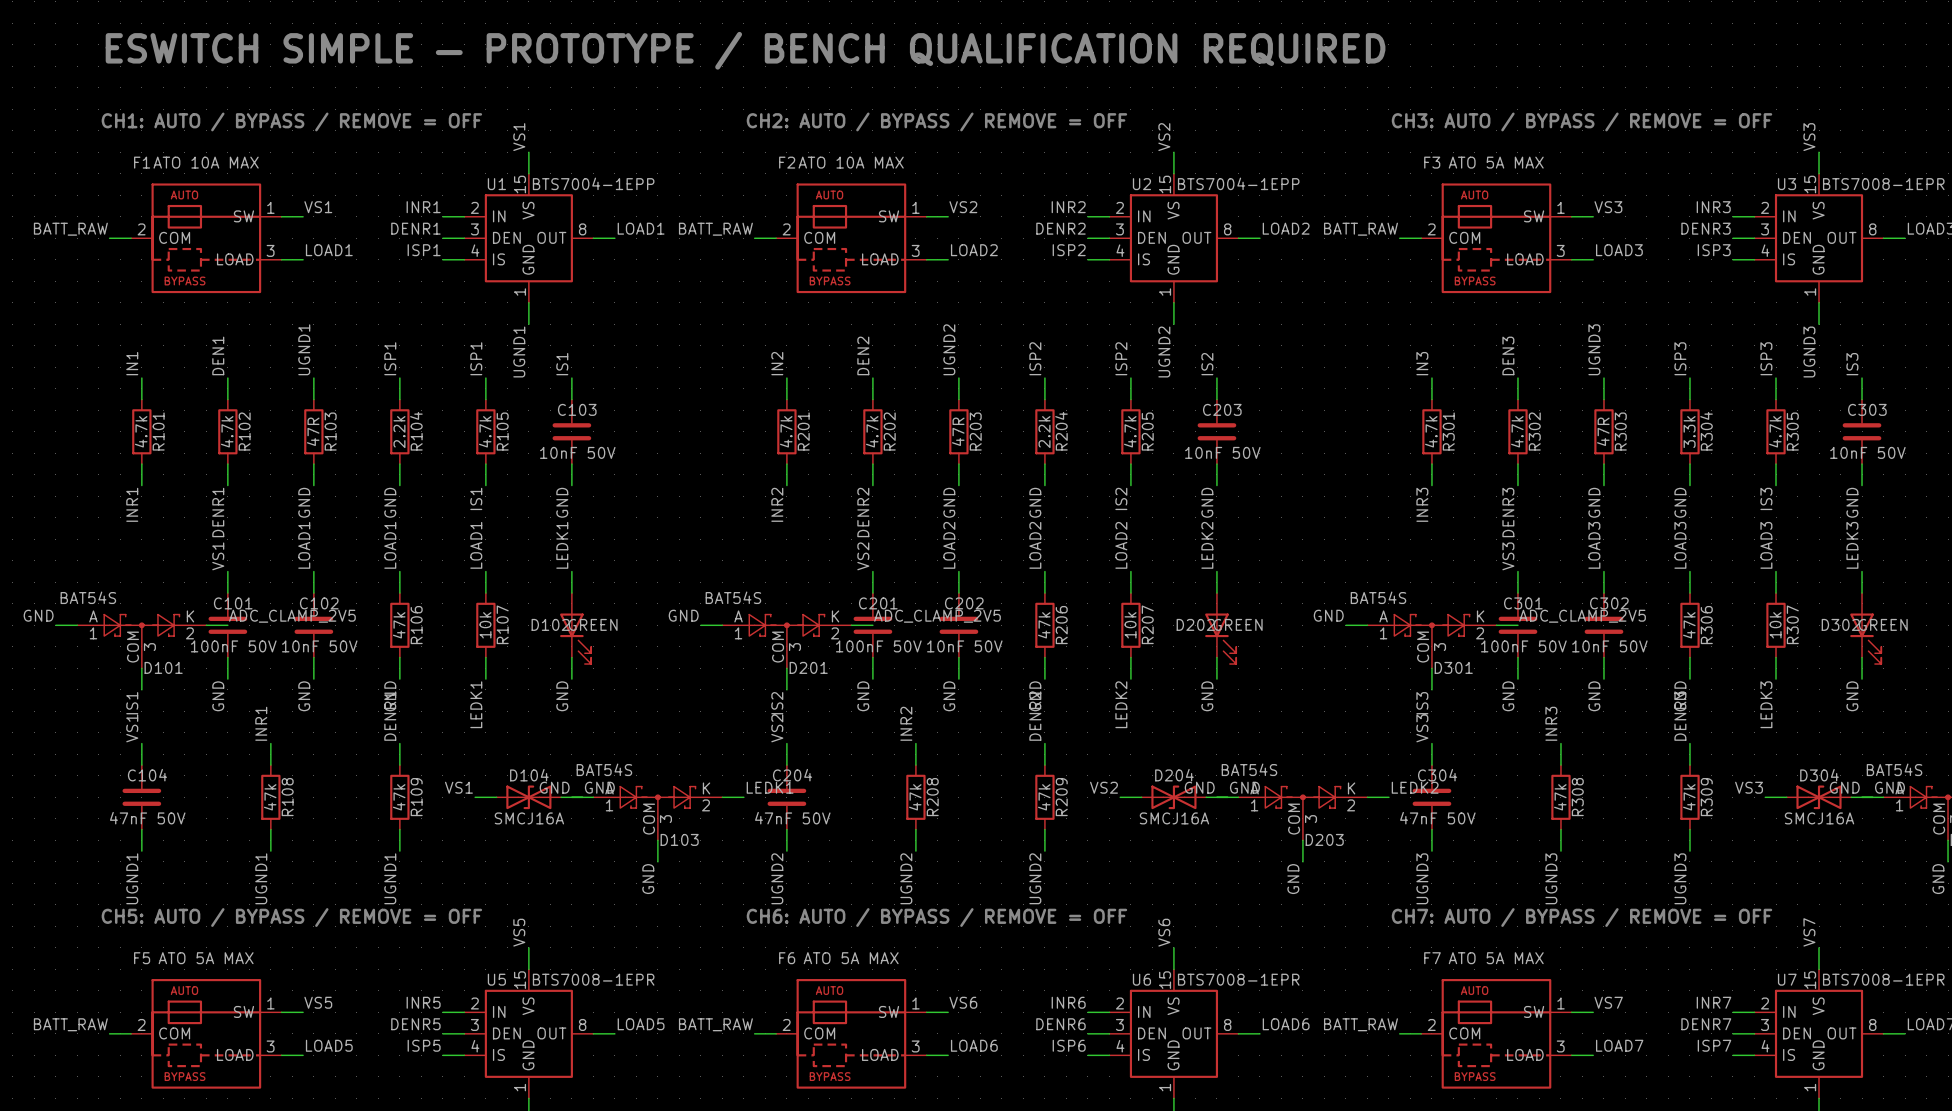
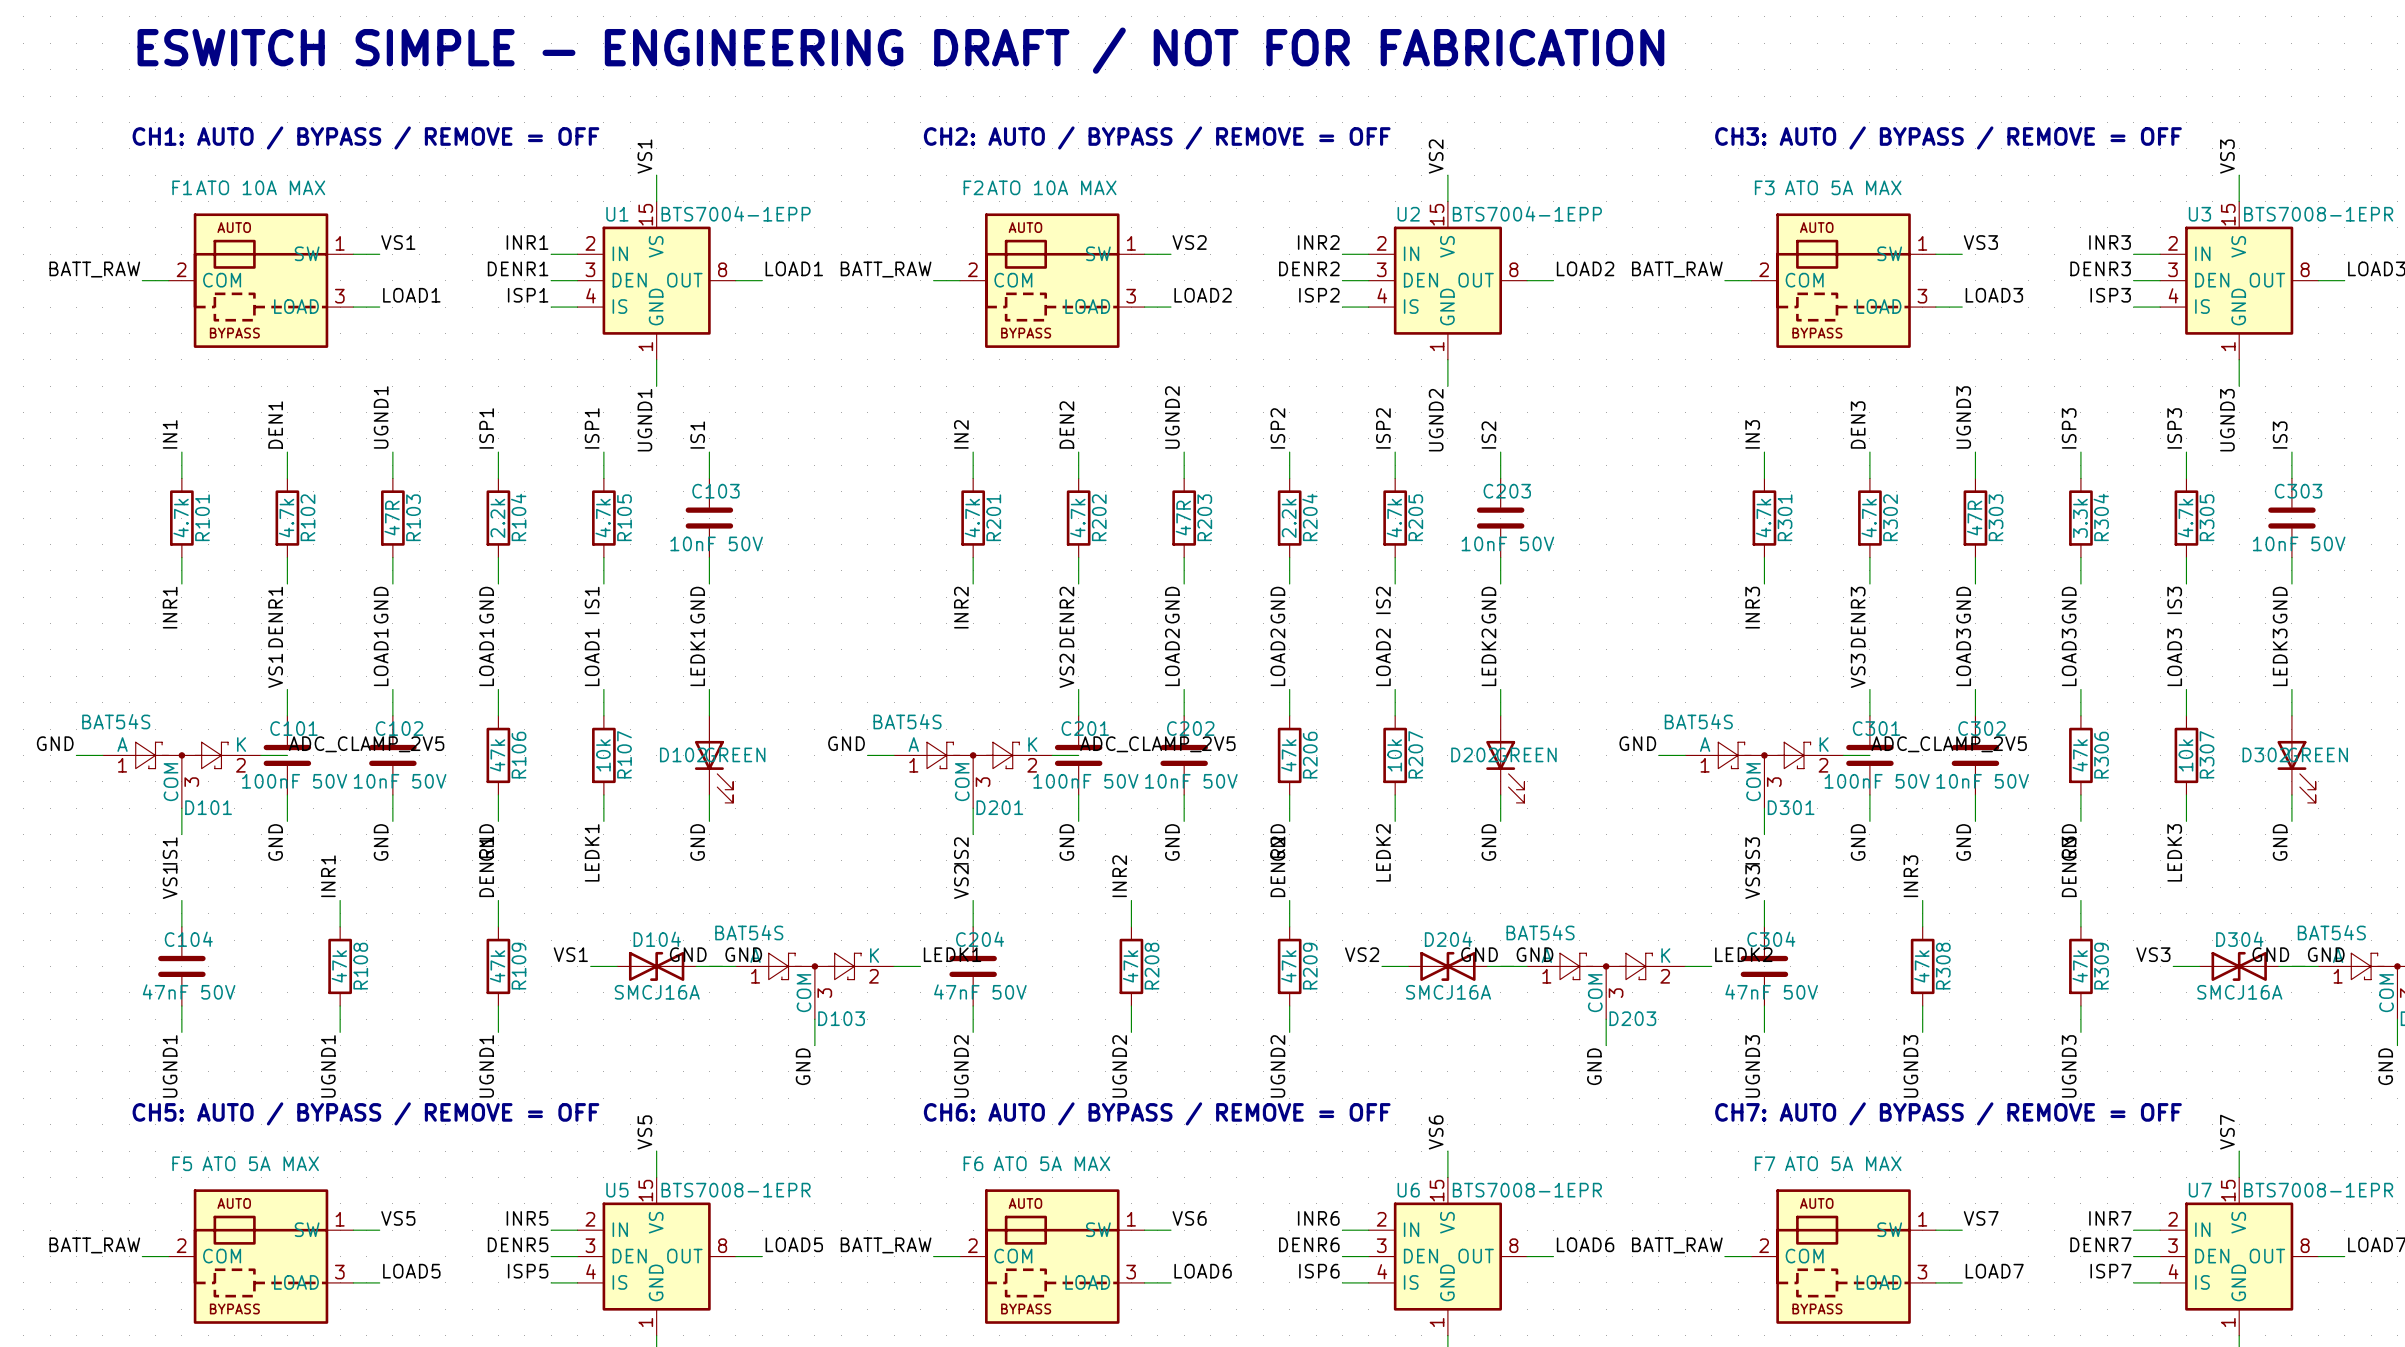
text: ESWITCH SIMPLE — PROTOTYPE / BENCH QUALIFICATION REQUIRED (745, 50) -> ESWITCH SIMPLE — ENGINEERING DRAFT / NOT FOR FABRICATION (900, 50)

